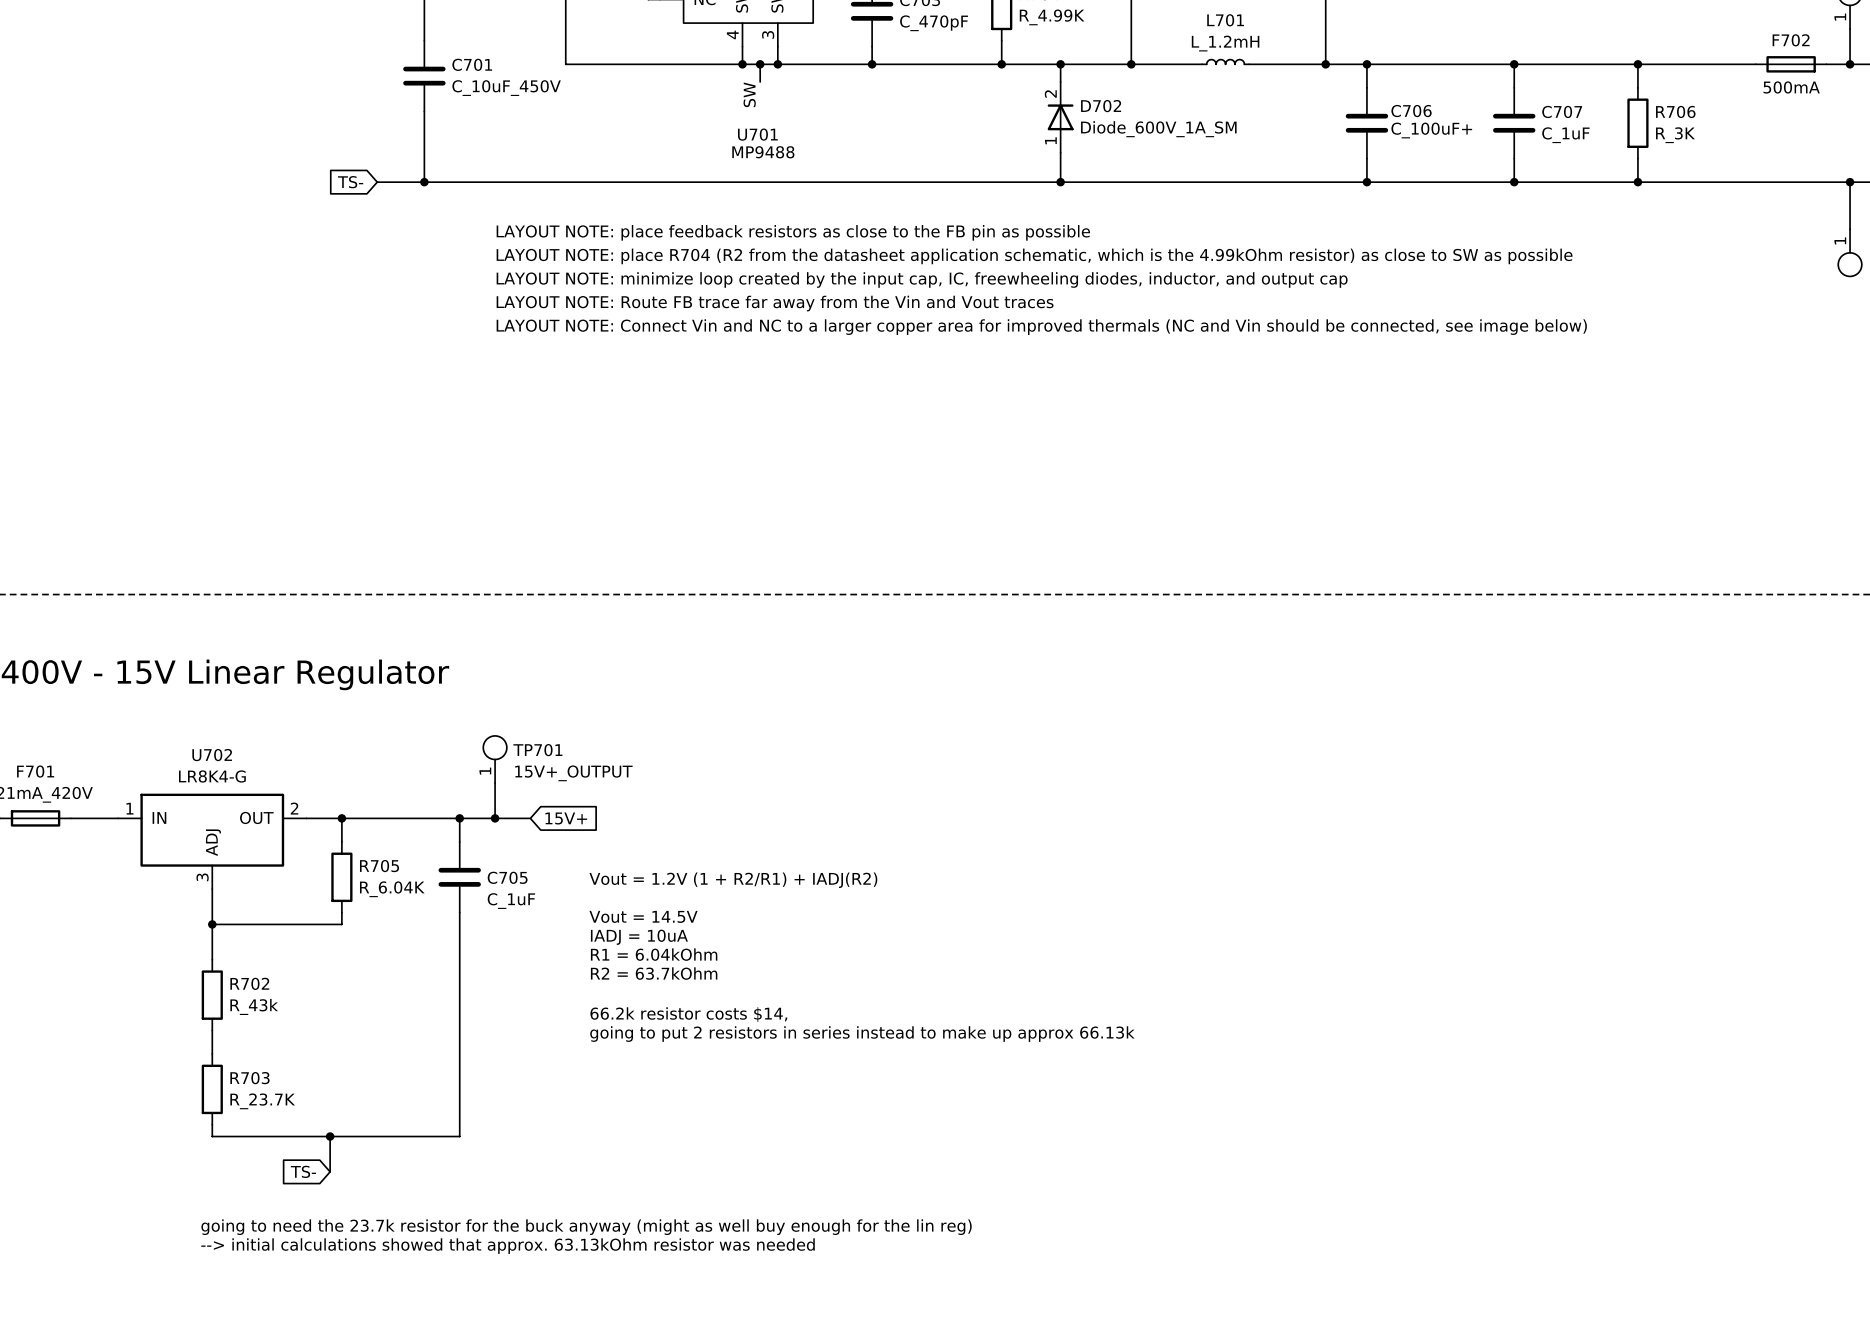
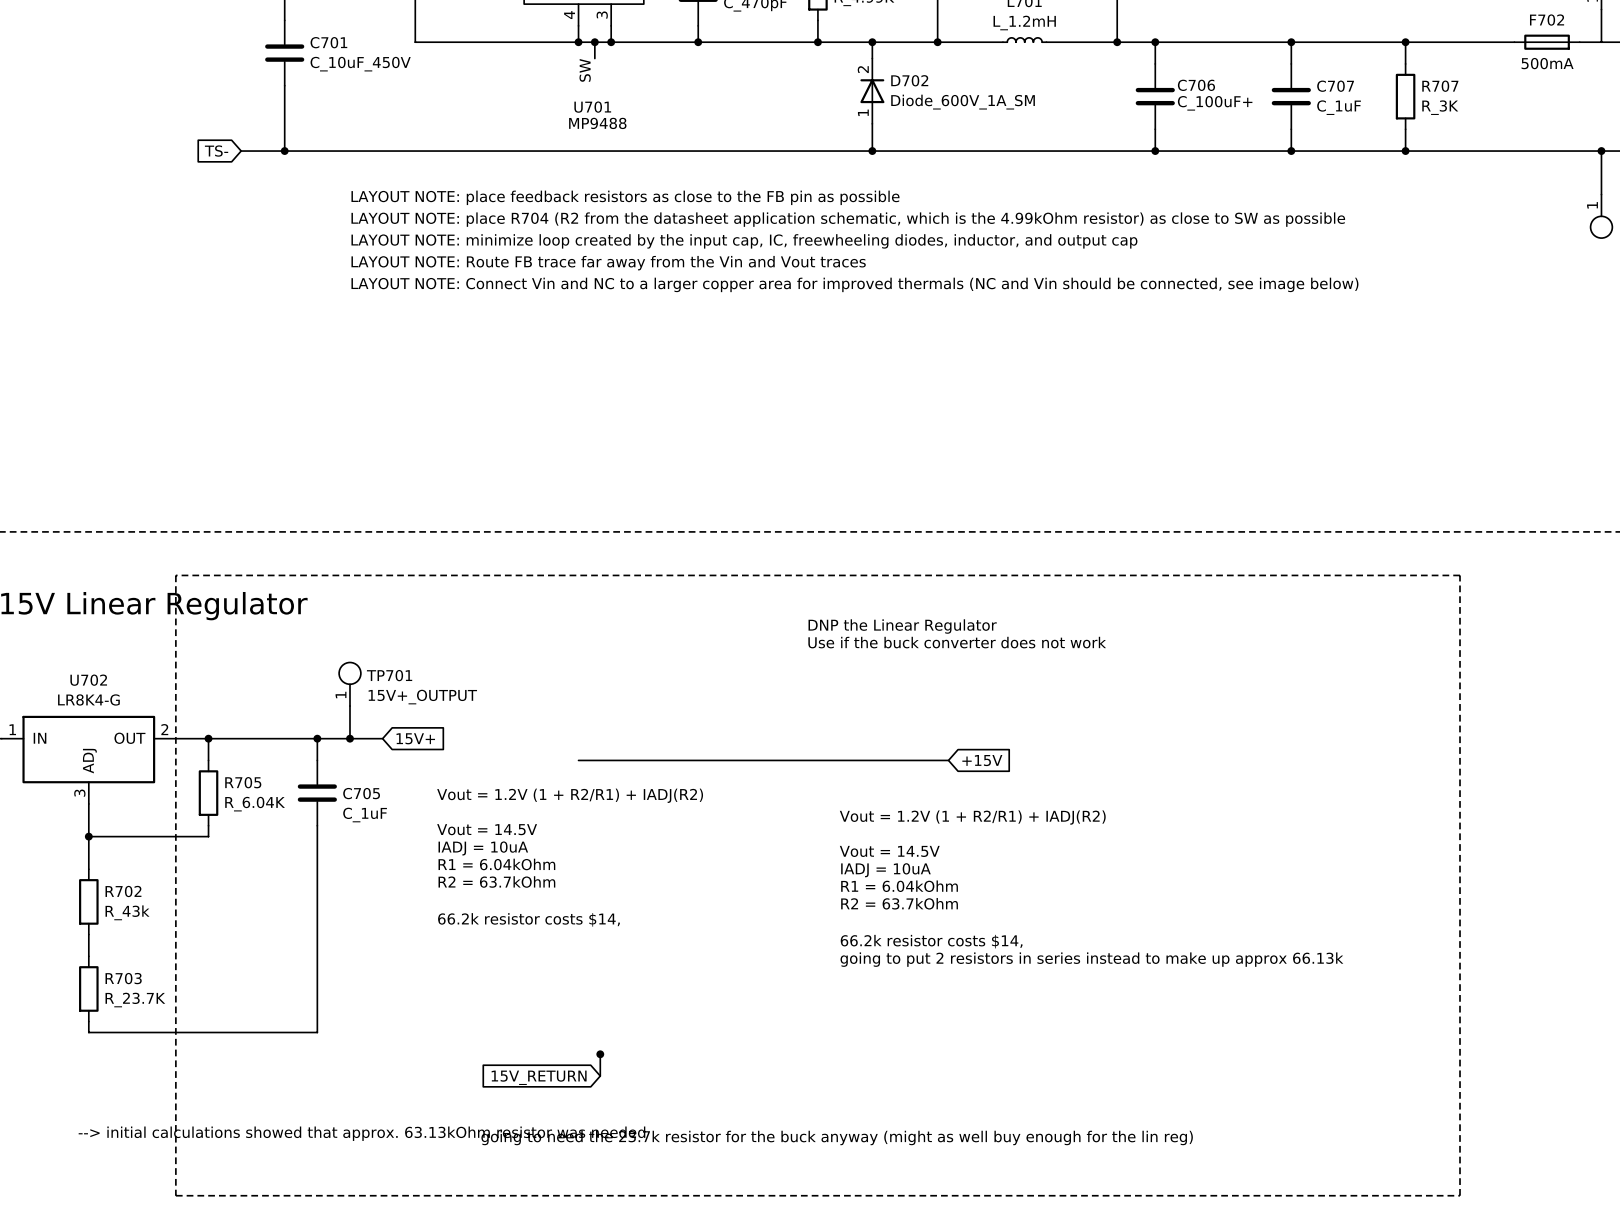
junction: (1850, 64) -> none
R706 name: R706 (1675, 111) -> R707 (1440, 86)
line: none -> (175, 575) (175, 1195) (1460, 1195) (1460, 575) (175, 575)
text: none -> DNP the Linear Regulator (902, 626)
text: none -> Use if the buck converter does not work (957, 642)
wire: none -> (578, 760) (948, 760)
global label: none -> +15V (982, 760)
text: none -> Vout = 1.2V (1 + R2/R1) + IADJ(R2) (972, 817)
text: none -> Vout = 14.5V (889, 851)
text: none -> IADJ = 10uA (885, 870)
text: none -> R1 = 6.04kOhm (899, 886)
text: none -> R2 = 63.7kOhm (899, 903)
text: going to put 2 resistors in series instead to make up approx 66.13k (862, 1034) -> none
text: none -> 66.2k resistor costs $14, (931, 941)
text: none -> going to put 2 resistors in series instead to make up approx 66.13k (1091, 959)
wire: (330, 1136) (330, 1171) -> none
junction: (330, 1136) -> none
wire: none -> (600, 1054) (600, 1076)
junction: none -> (600, 1054)
global label: TS- (303, 1171) -> none
global label: none -> 15V_RETURN (539, 1077)
text: going to need the 23.7k resistor for the buck anyway (might as well buy enough for the lin reg) (586, 1227) -> none
text: none -> going to need the 23.7k resistor for the buck anyway (might as well buy enough for the lin reg) (837, 1137)

